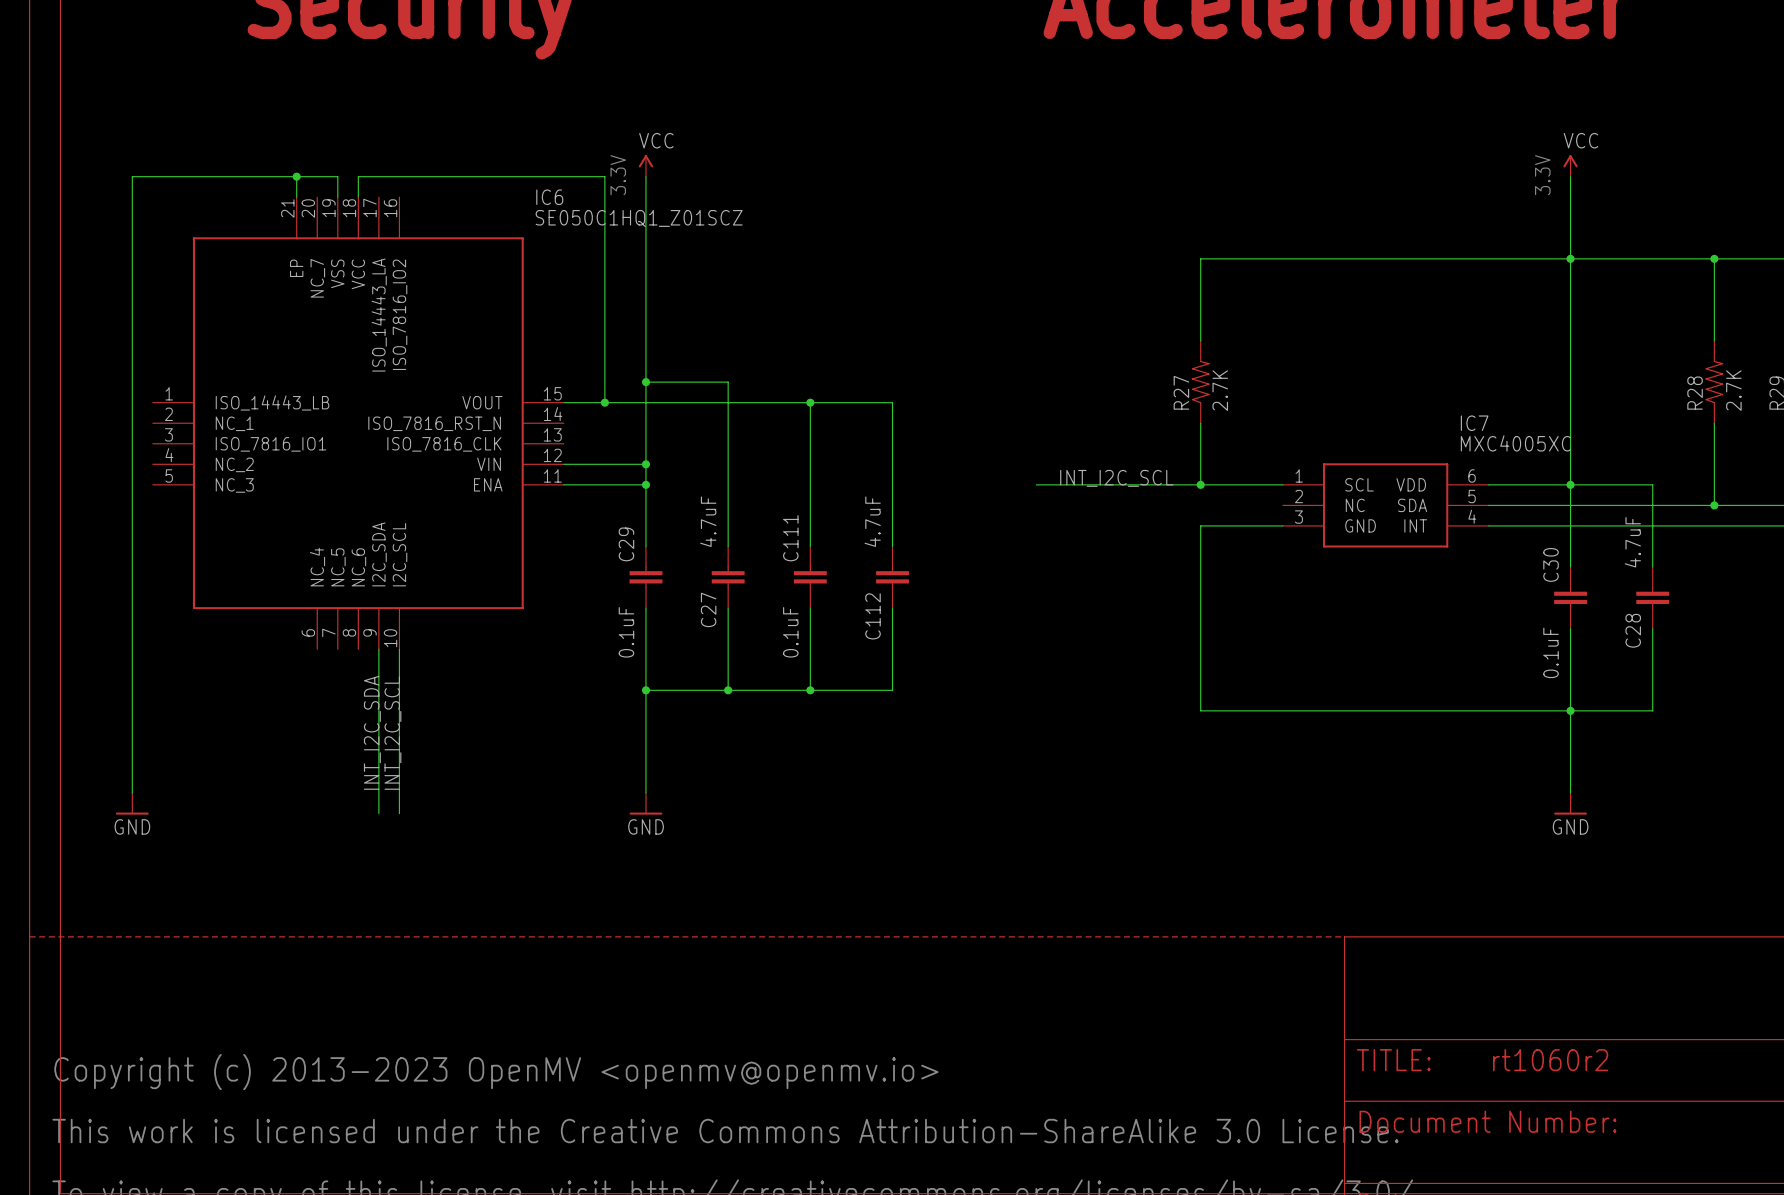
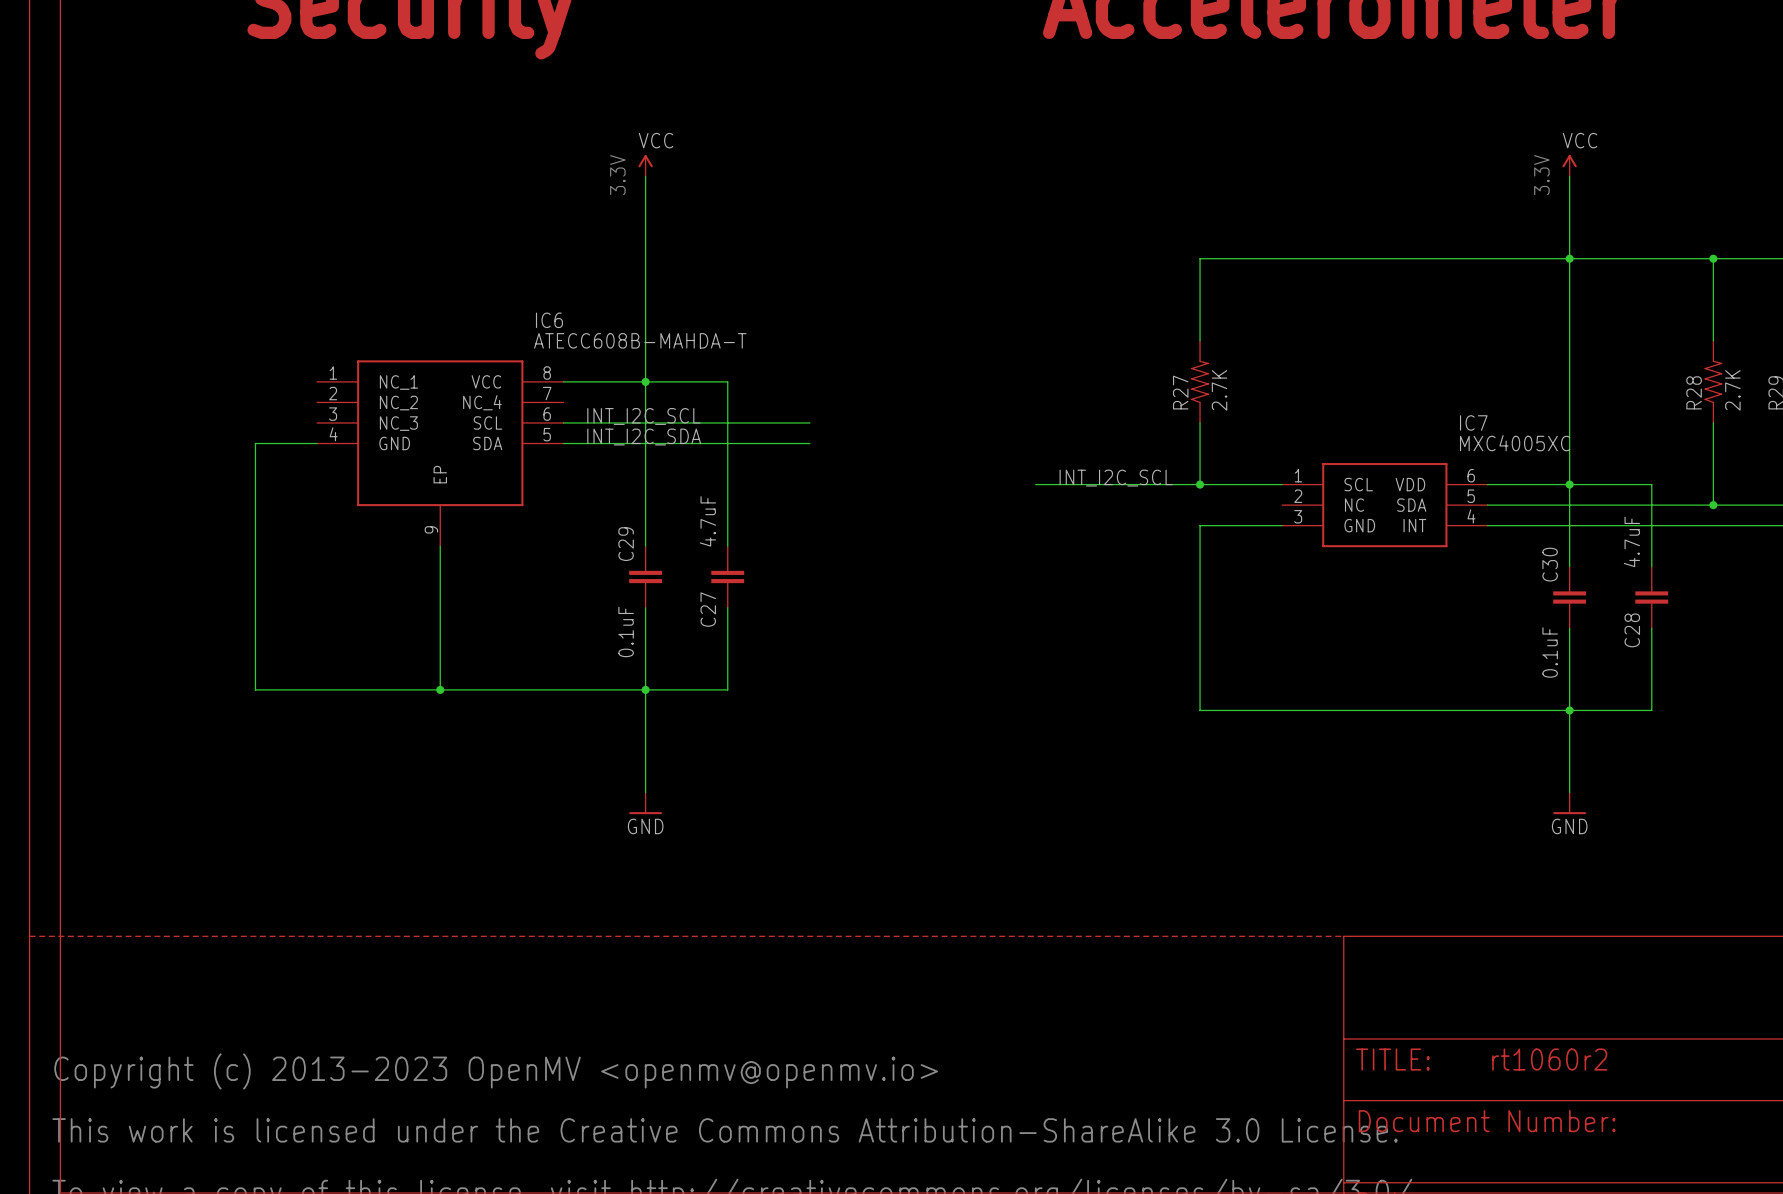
wire: (296, 176) (296, 197) -> none
junction: (296, 176) -> none
IC6 symbol: [152, 197, 564, 650] -> [317, 360, 564, 547]
wire: (337, 197) (337, 176) (132, 176) (132, 793) -> none
wire: (358, 197) (358, 176) (604, 176) (604, 402) -> none
IC6 name position: IC6 (549, 197) -> IC6 (549, 320)
IC6 value: SE050C1HQ1_Z01SCZ (639, 218) -> ATECC608B-MAHDA-T (640, 340)
wire: (563, 402) (892, 402) (892, 546) -> none
junction: (604, 402) -> none
wire: (810, 402) (810, 546) -> none
junction: (810, 402) -> none
label: none -> INT_I2C_SCL (643, 416)
wire: none -> (563, 422) (809, 422)
label: none -> INT_I2C_SDA (644, 437)
wire: none -> (317, 443) (255, 443) (255, 689) (645, 689)
wire: none -> (563, 443) (809, 443)
wire: (563, 464) (645, 464) -> (563, 381) (645, 381)
junction: (645, 464) -> none
wire: (563, 484) (645, 484) -> none
junction: (645, 484) -> none
wire: none -> (440, 546) (440, 689)
C111: 0.1uF (810, 577) -> none
C112: 4.7uF (892, 577) -> none
wire: (810, 608) (810, 690) -> none
wire: (892, 608) (892, 690) (728, 690) -> none
wire: (378, 649) (378, 813) -> none
wire: (399, 649) (399, 813) -> none
junction: none -> (440, 689)
junction: (728, 690) -> none
junction: (810, 690) -> none
label: INT_I2C_SDA (372, 732) -> none
label: INT_I2C_SCL (392, 733) -> none
power symbol: GND (132, 803) -> none

